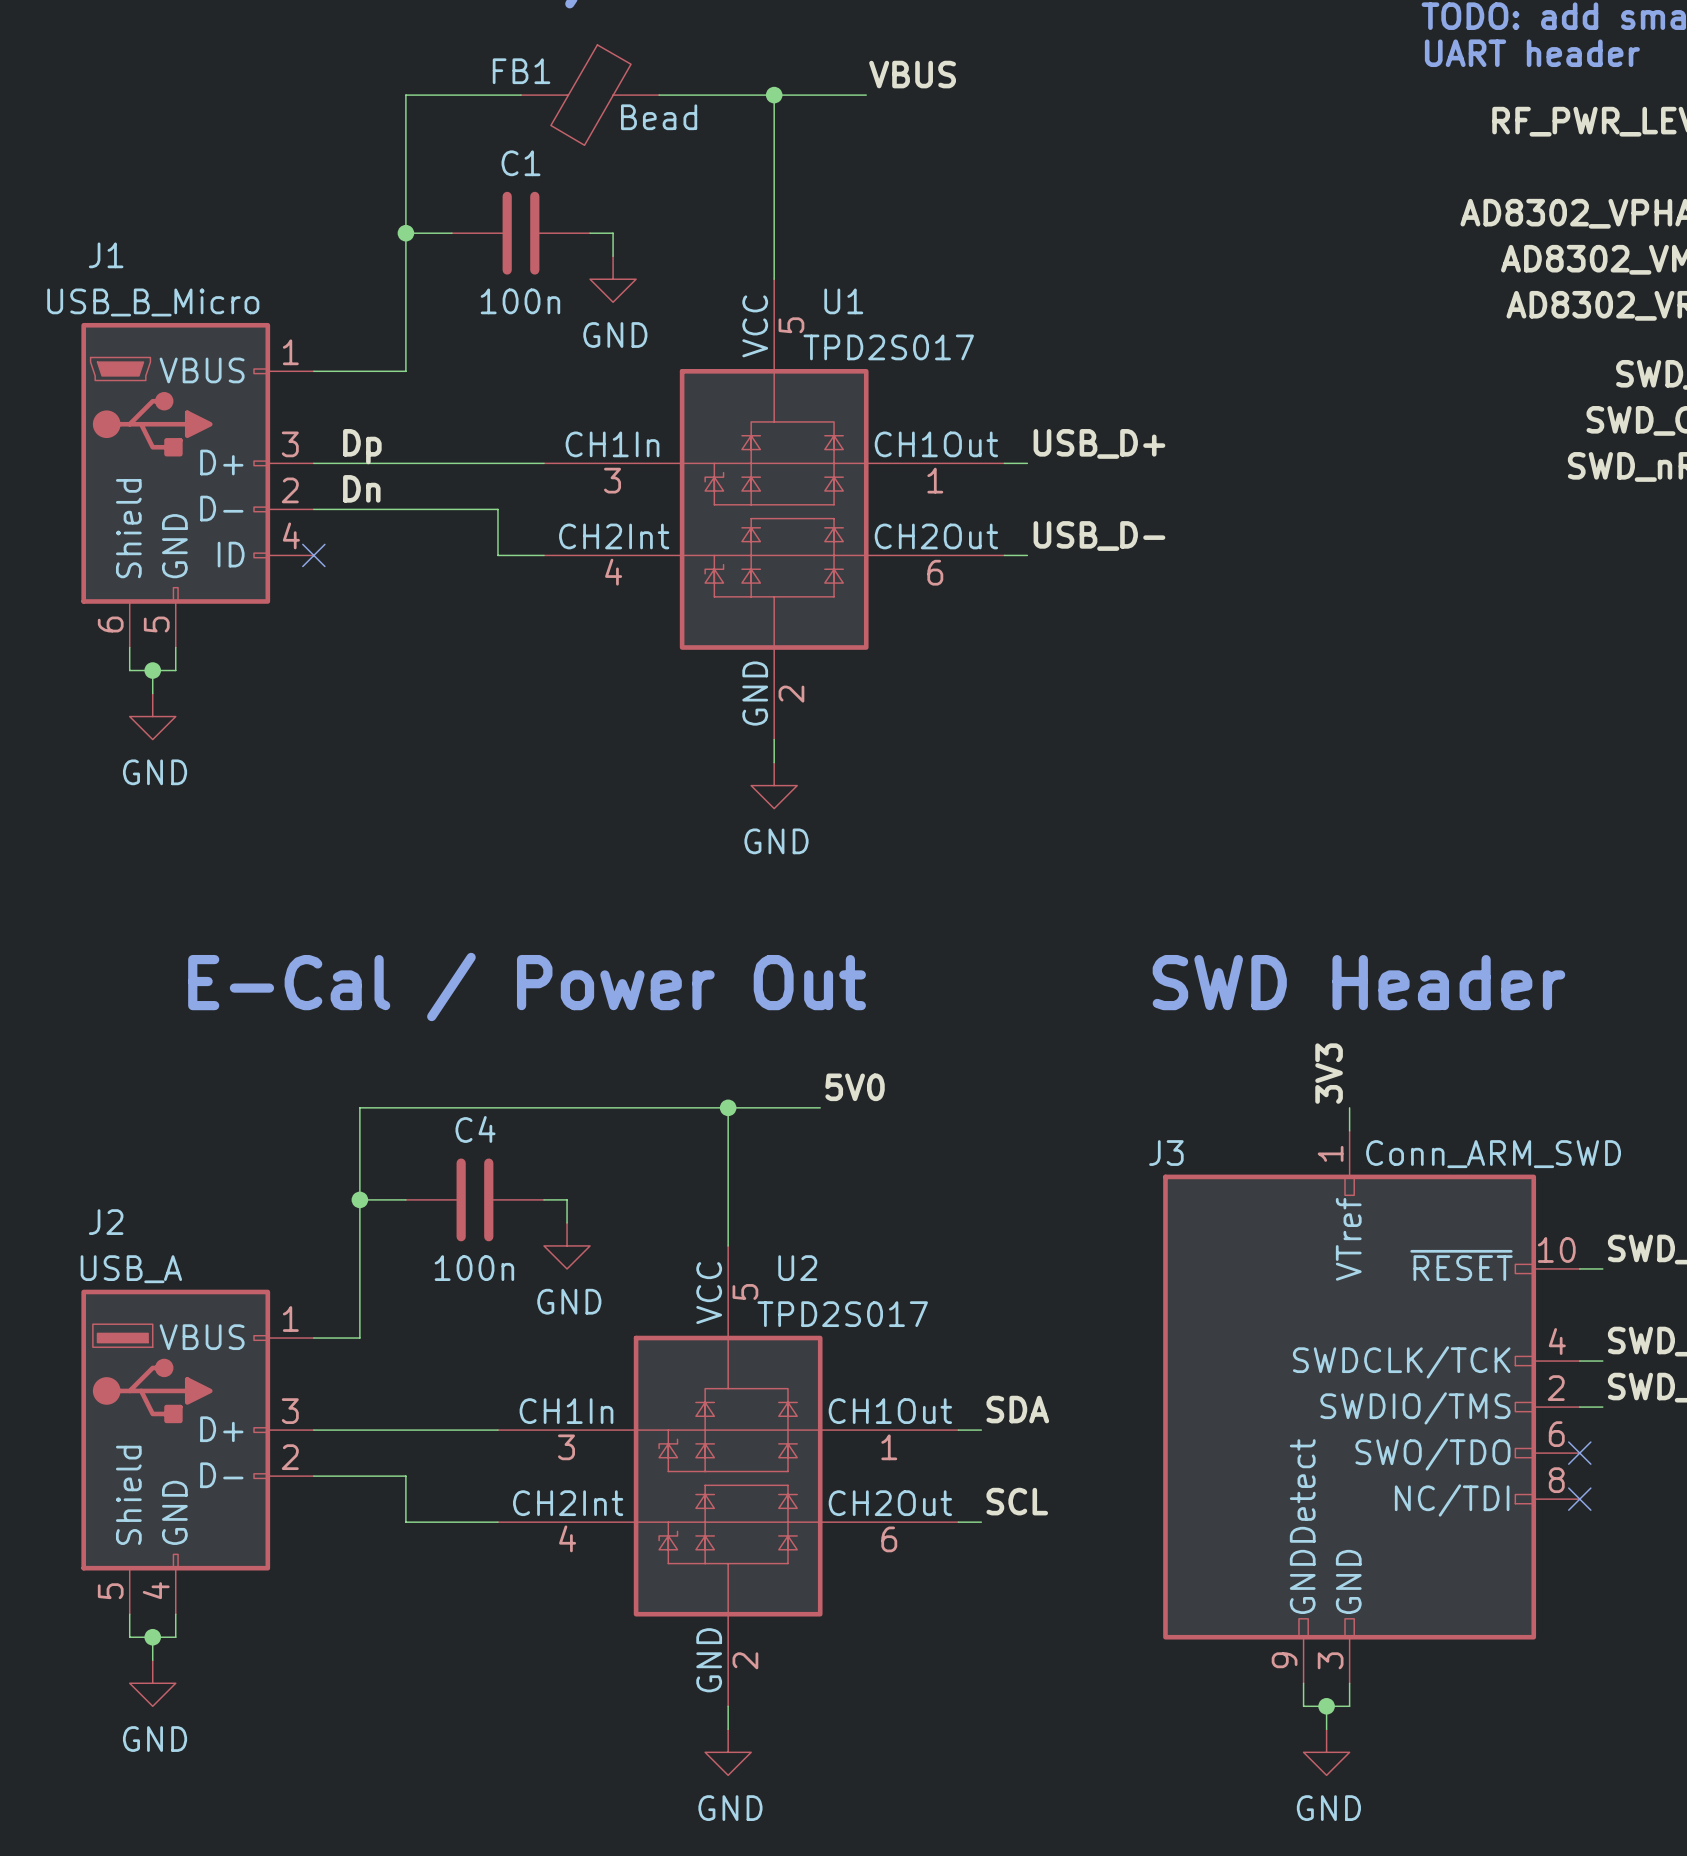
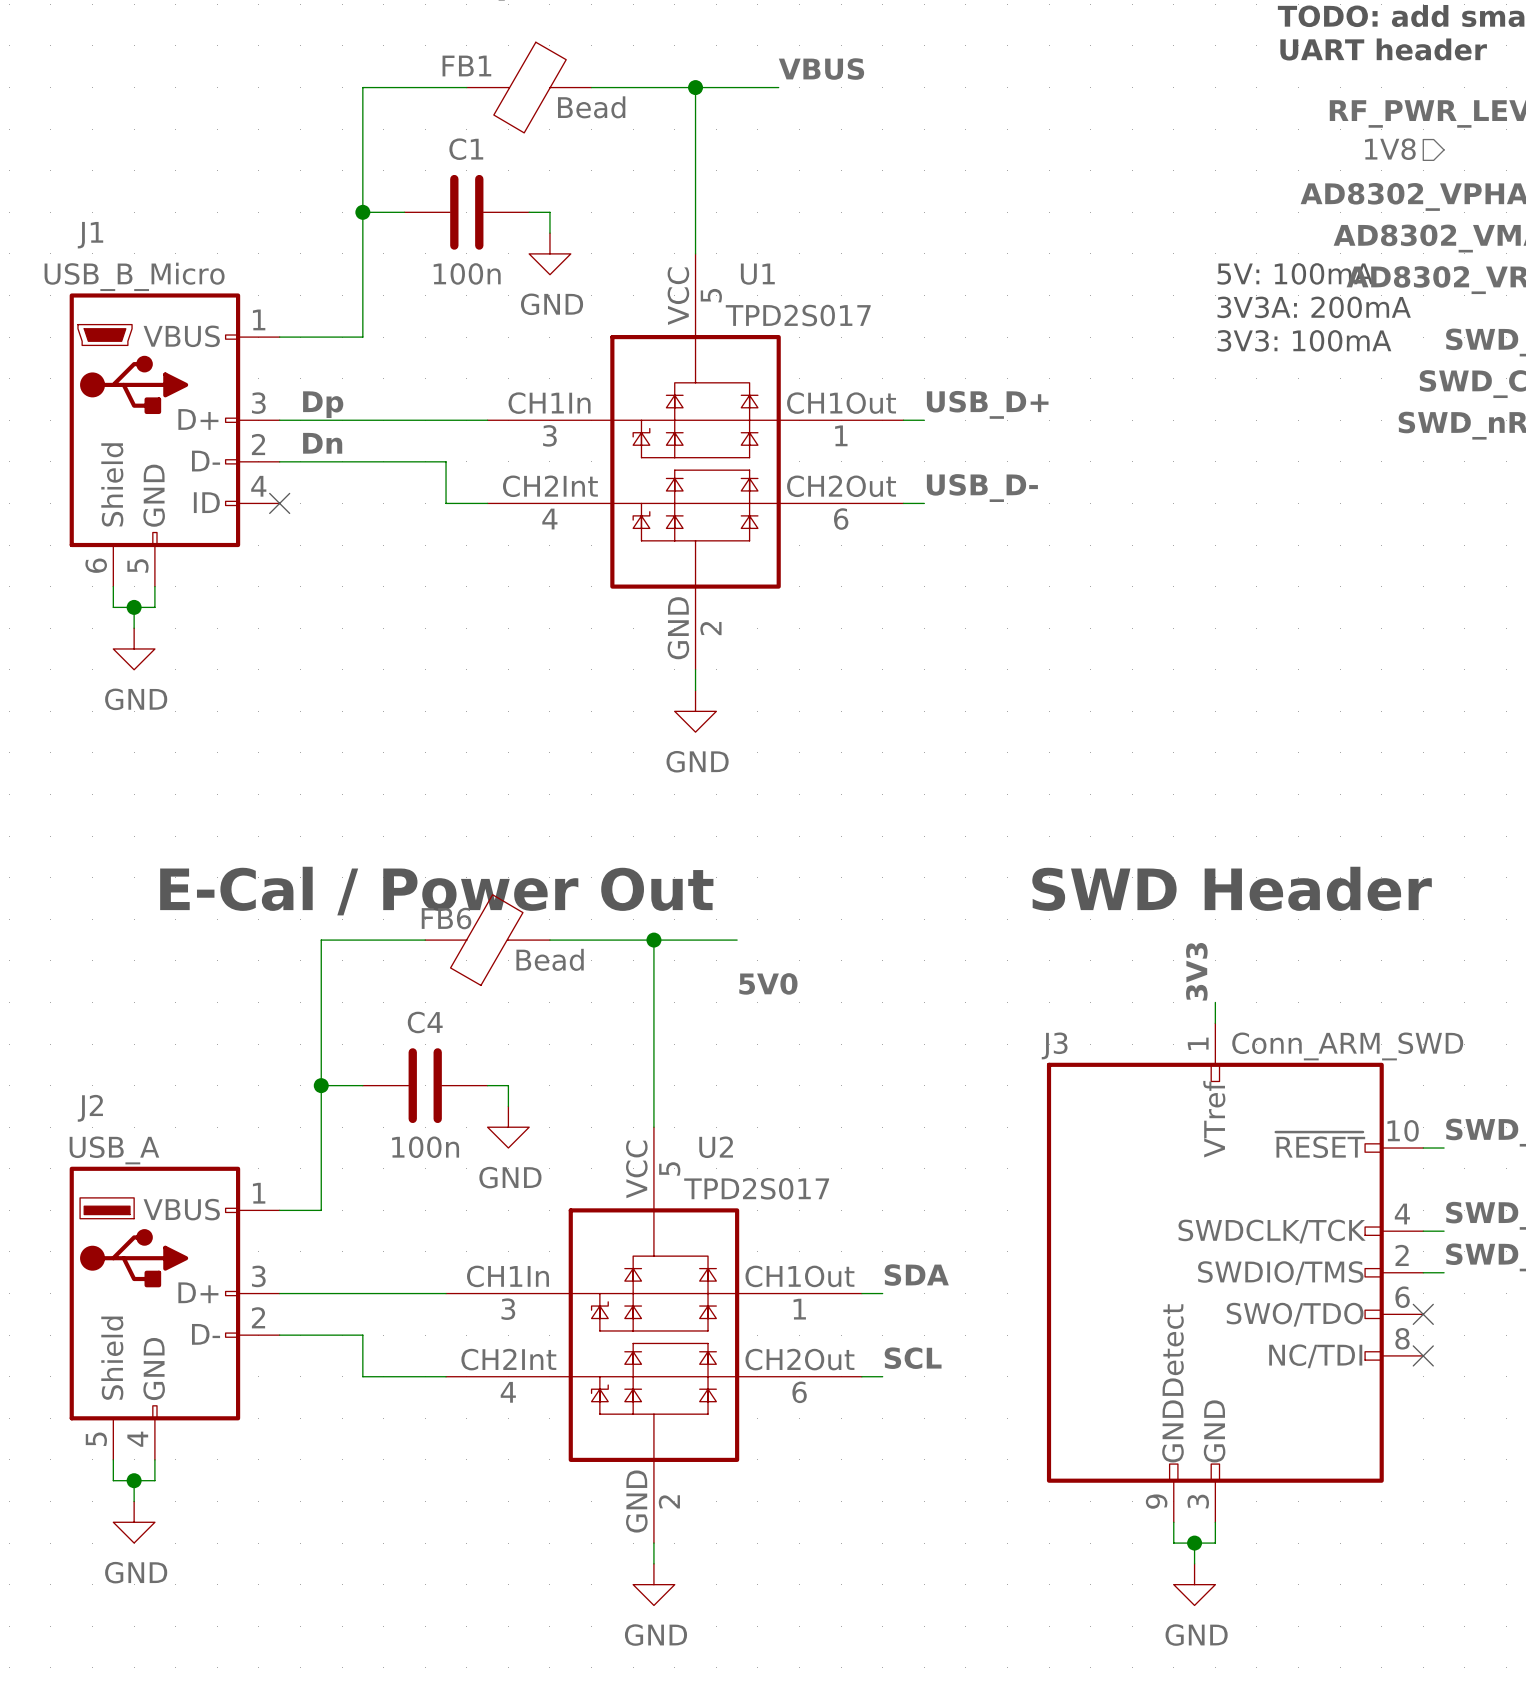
sheet pin: none -> 1V8 (1390, 149)
text: none -> 5V: 100mA (1295, 273)
text: none -> 3V3A: 200mA (1314, 307)
text: none -> 3V3: 100mA (1304, 340)
FB6: none -> Bead (487, 940)
wire: none -> (549, 940) (737, 940)
wire: none -> (653, 940) (653, 1002)
wire: (359, 1107) (820, 1107) -> (321, 1002) (321, 940) (425, 940)
junction position: (728, 1107) -> (653, 940)

